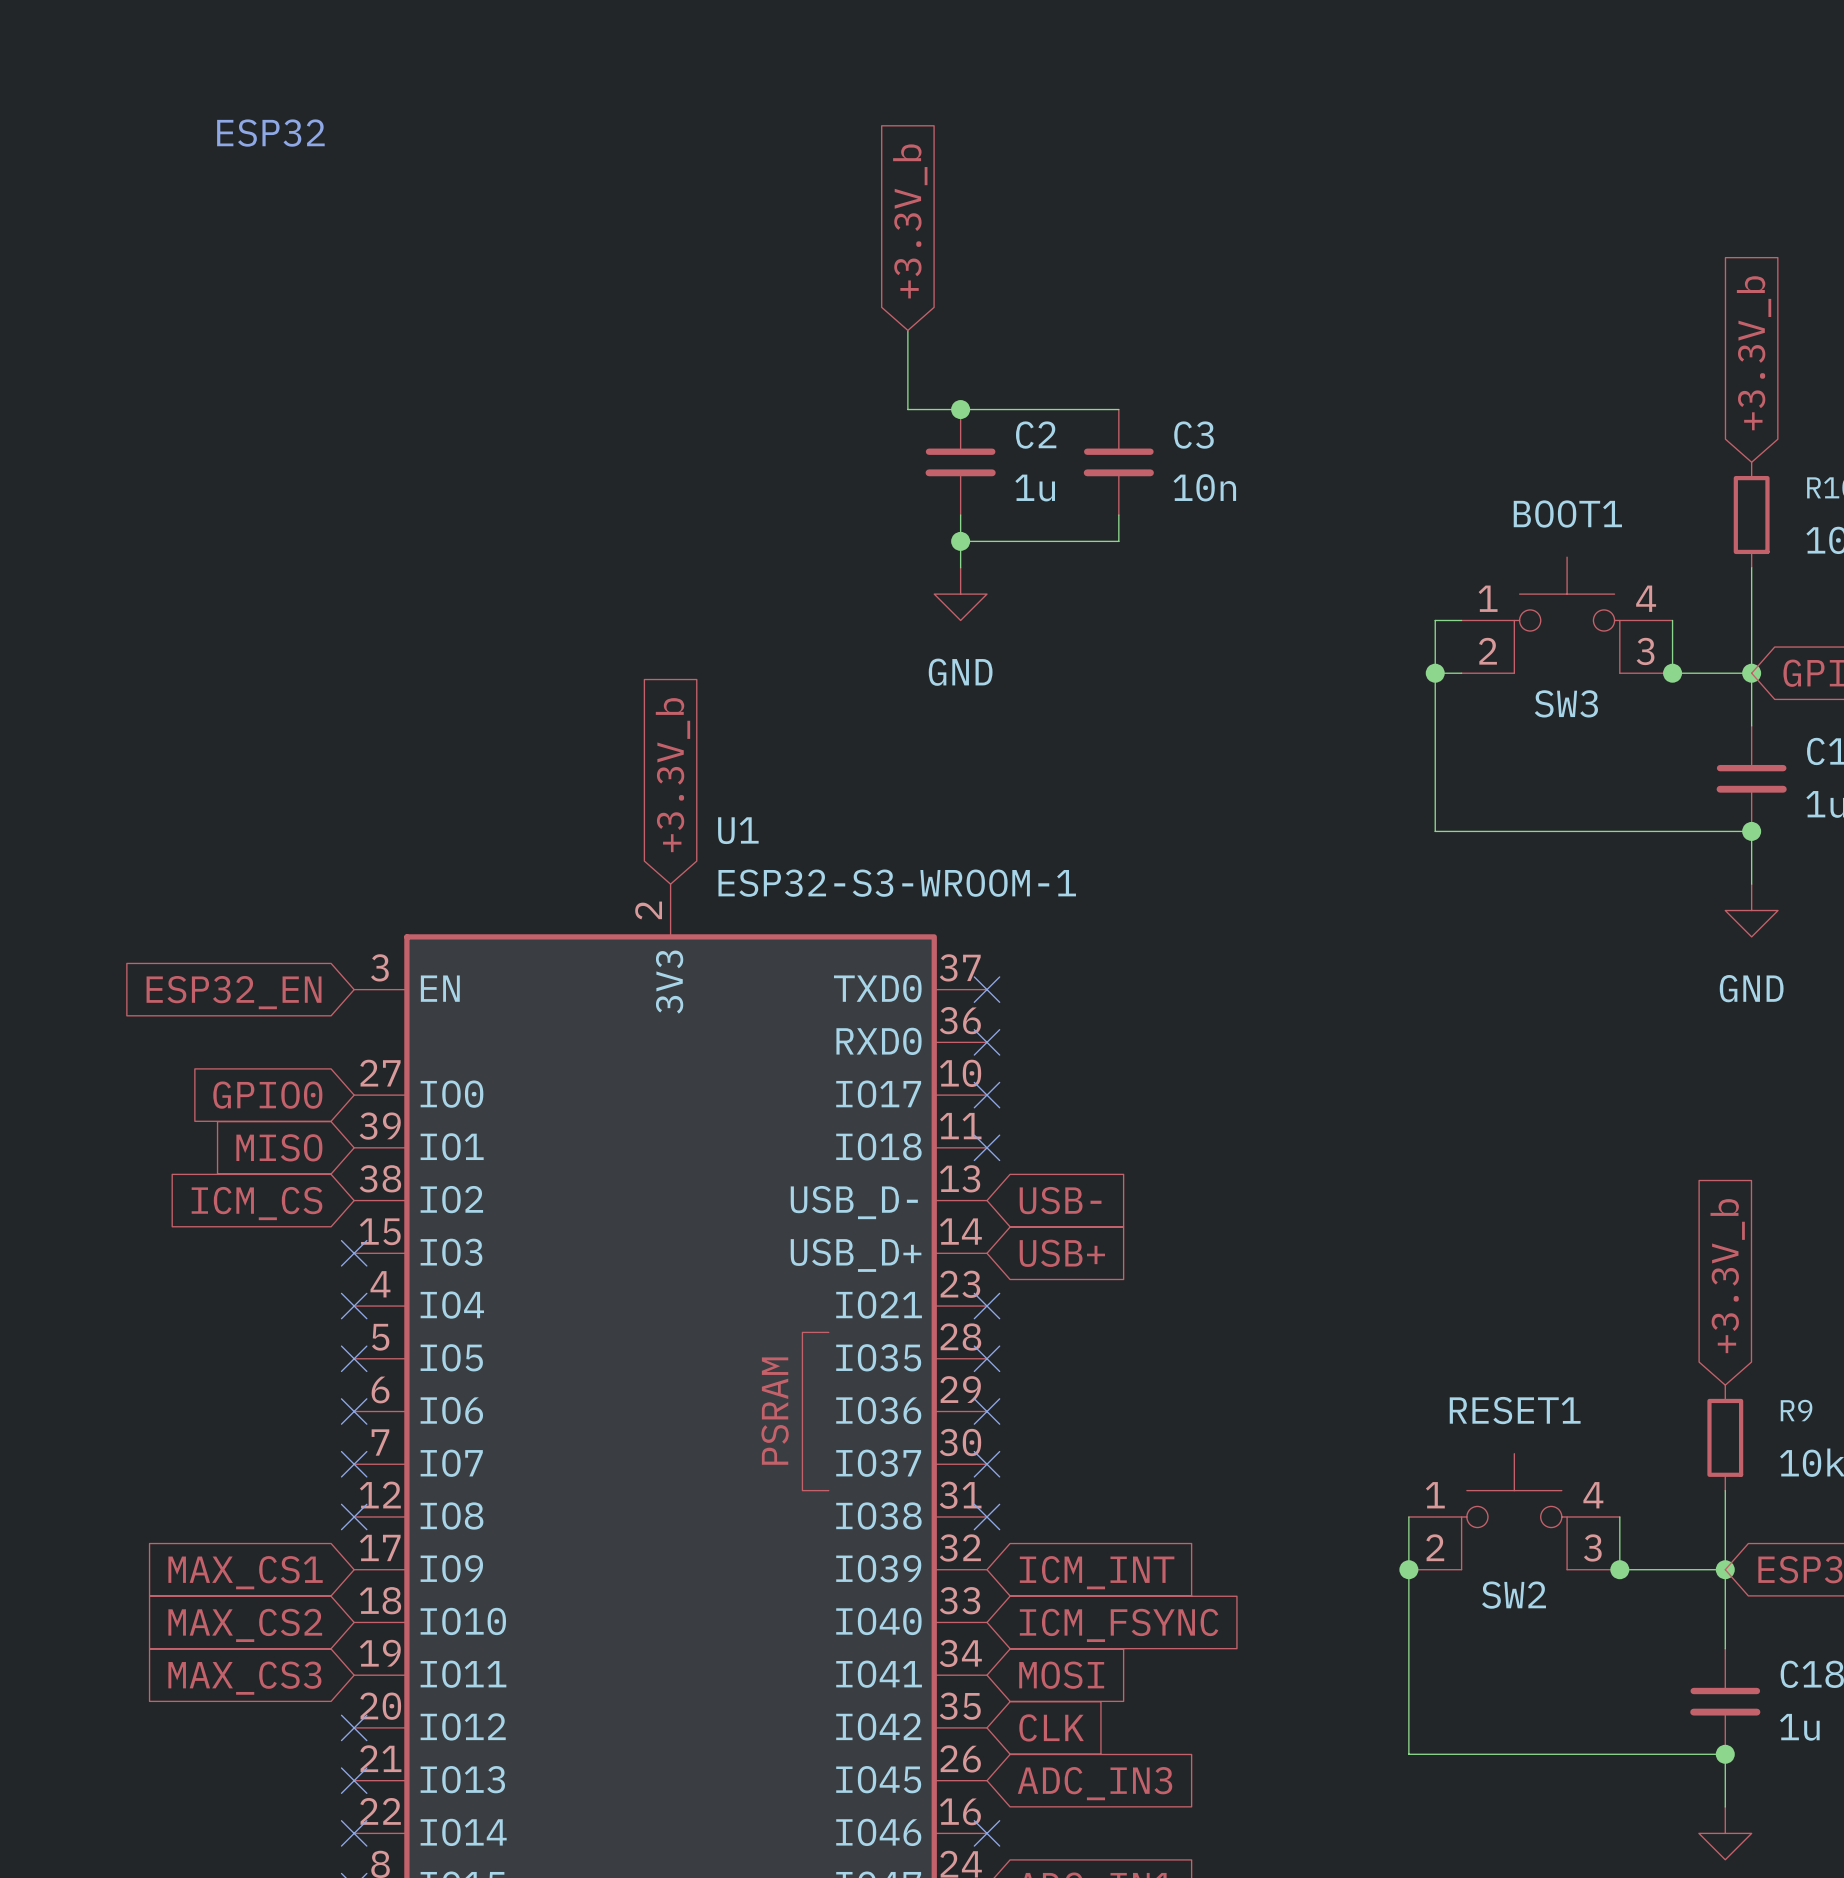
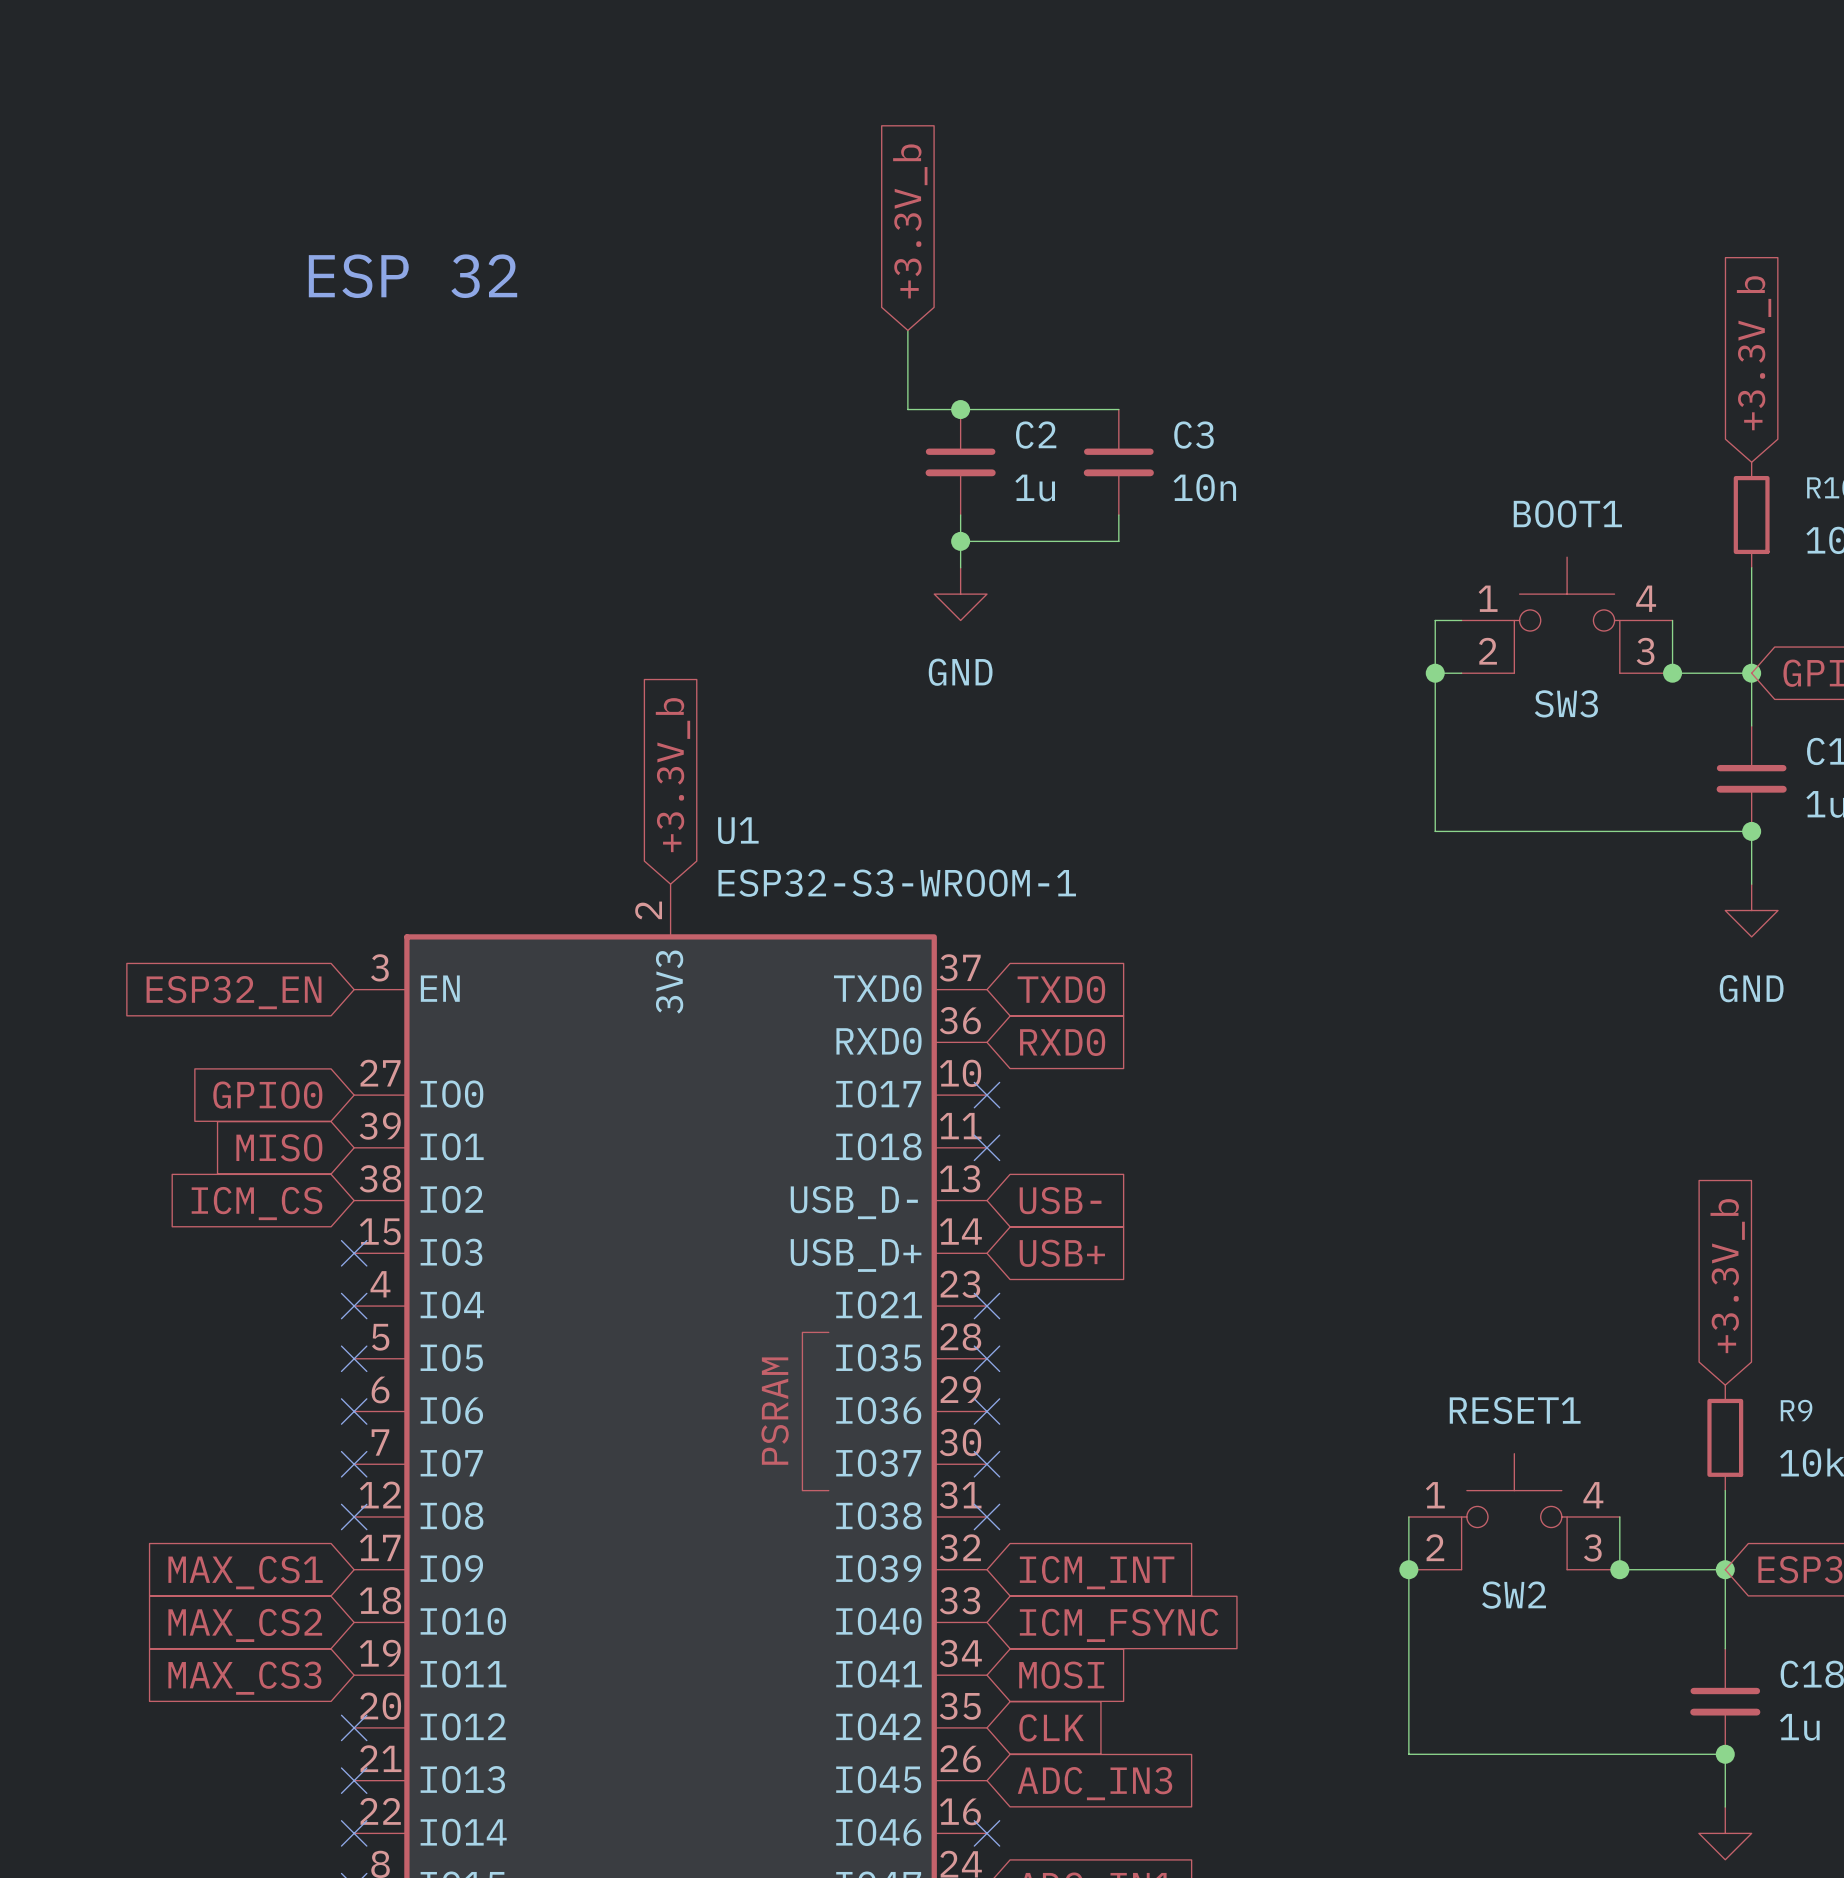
text: ESP32 (270, 133) -> none
text: none -> ESP 32 (412, 276)
no-connect mark: (986, 989) -> none
global label: none -> TXD0 (1061, 989)
no-connect mark: (986, 1042) -> none
global label: none -> RXD0 (1062, 1042)

